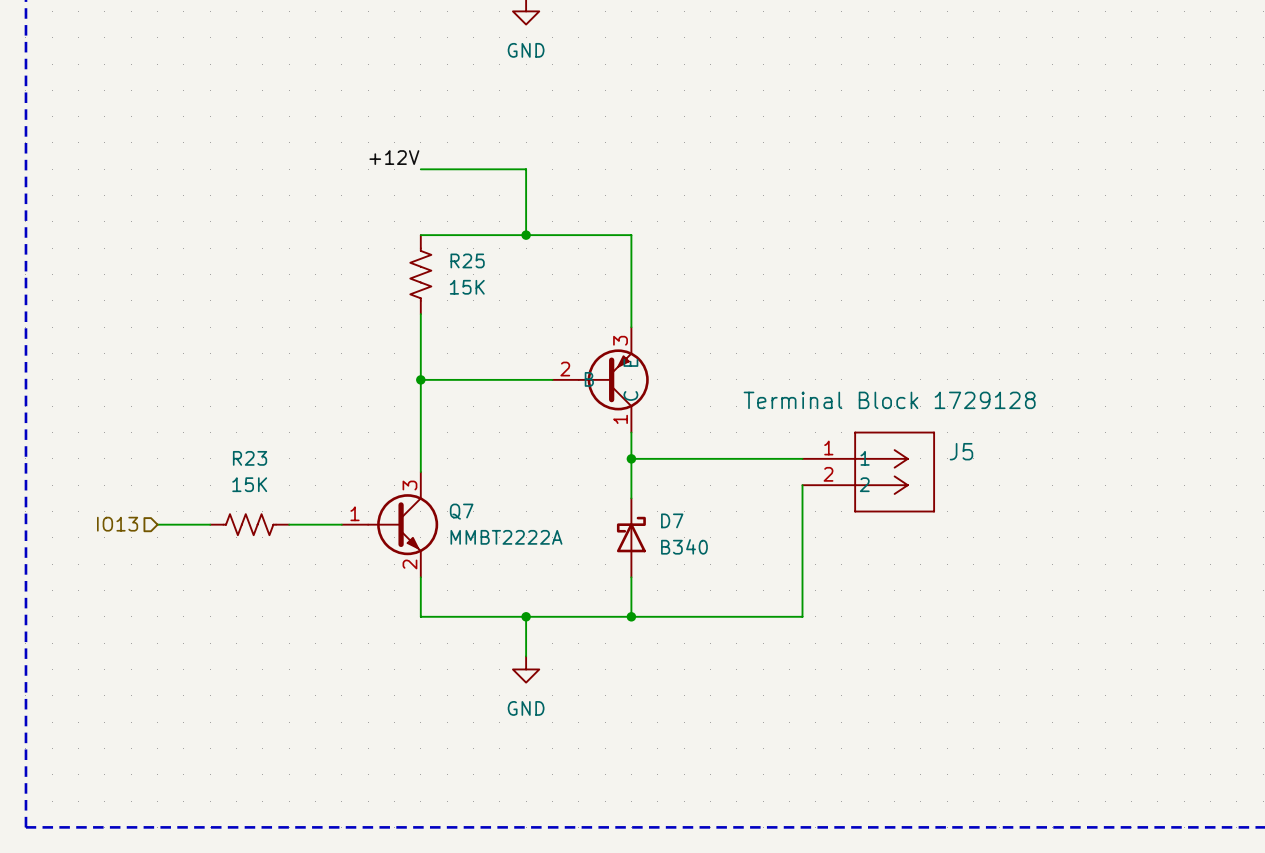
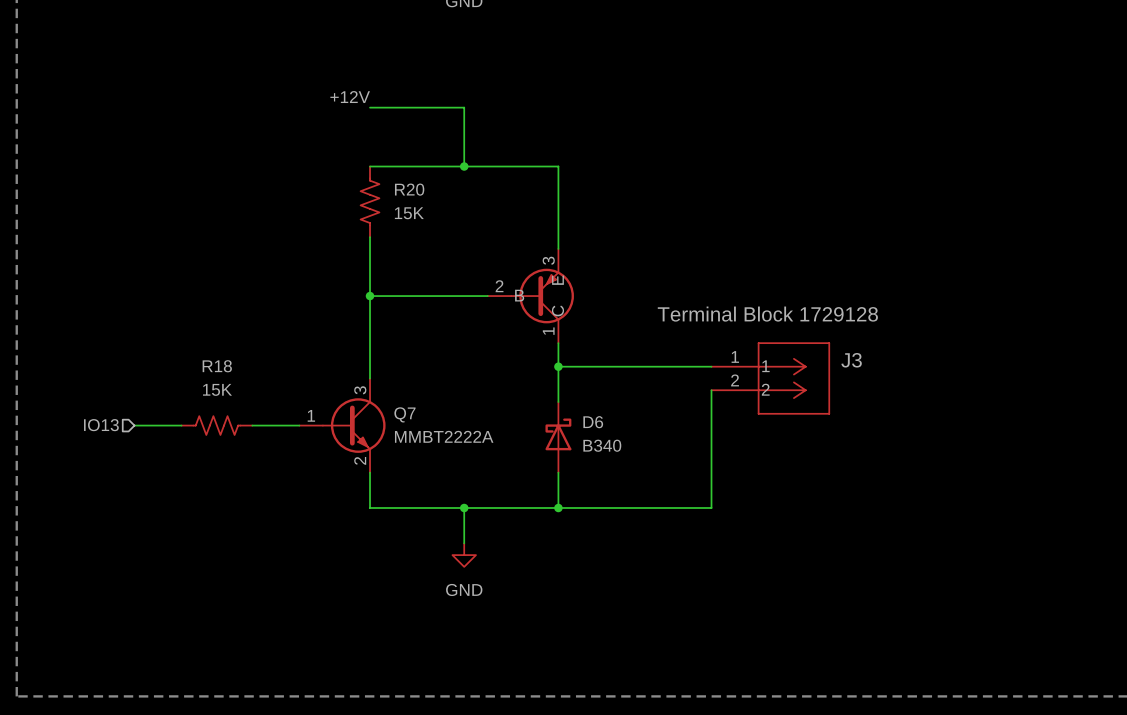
R25 name: R25 (467, 260) -> R20 (409, 189)
J5 name: J5 (961, 451) -> J3 (851, 360)
R23 name: R23 (250, 458) -> R18 (217, 366)
D7 name: D7 (672, 520) -> D6 (593, 422)

